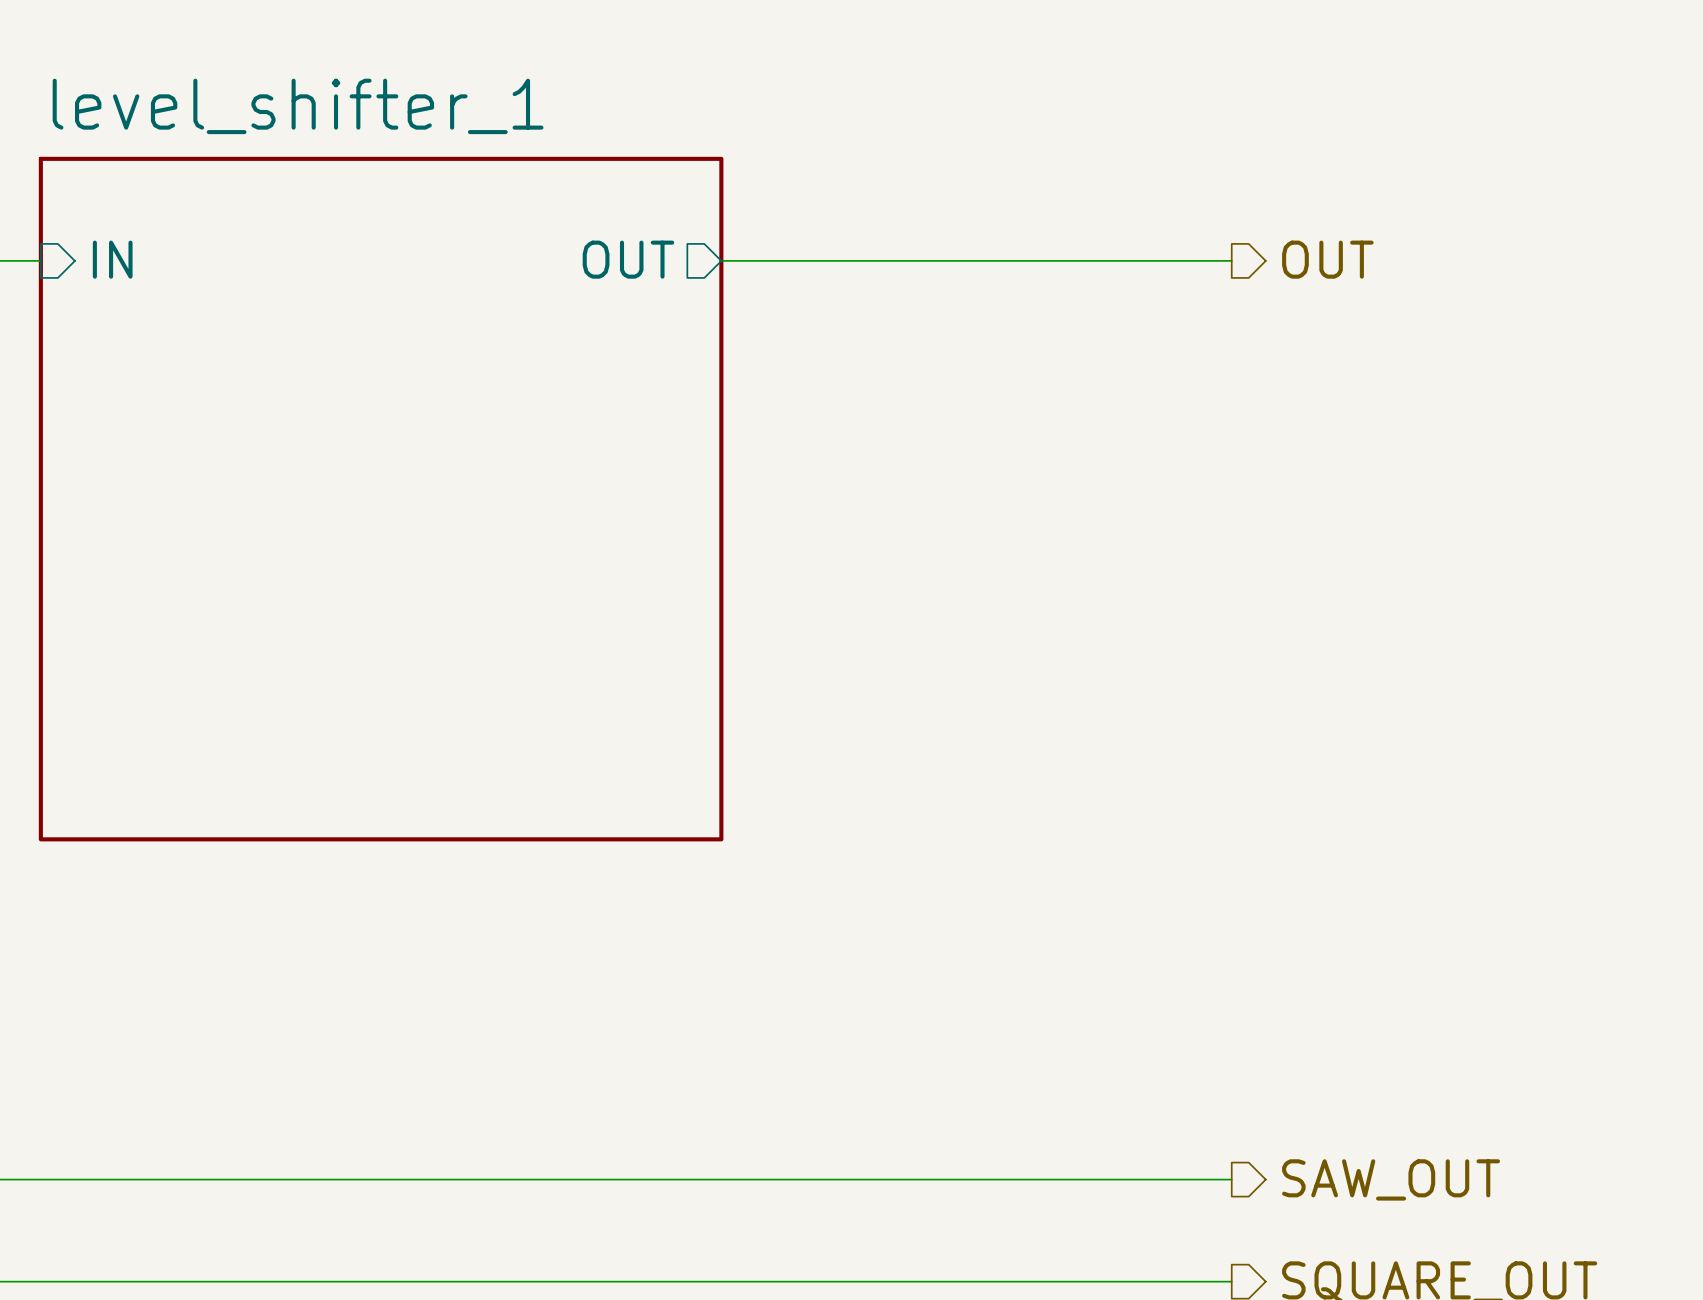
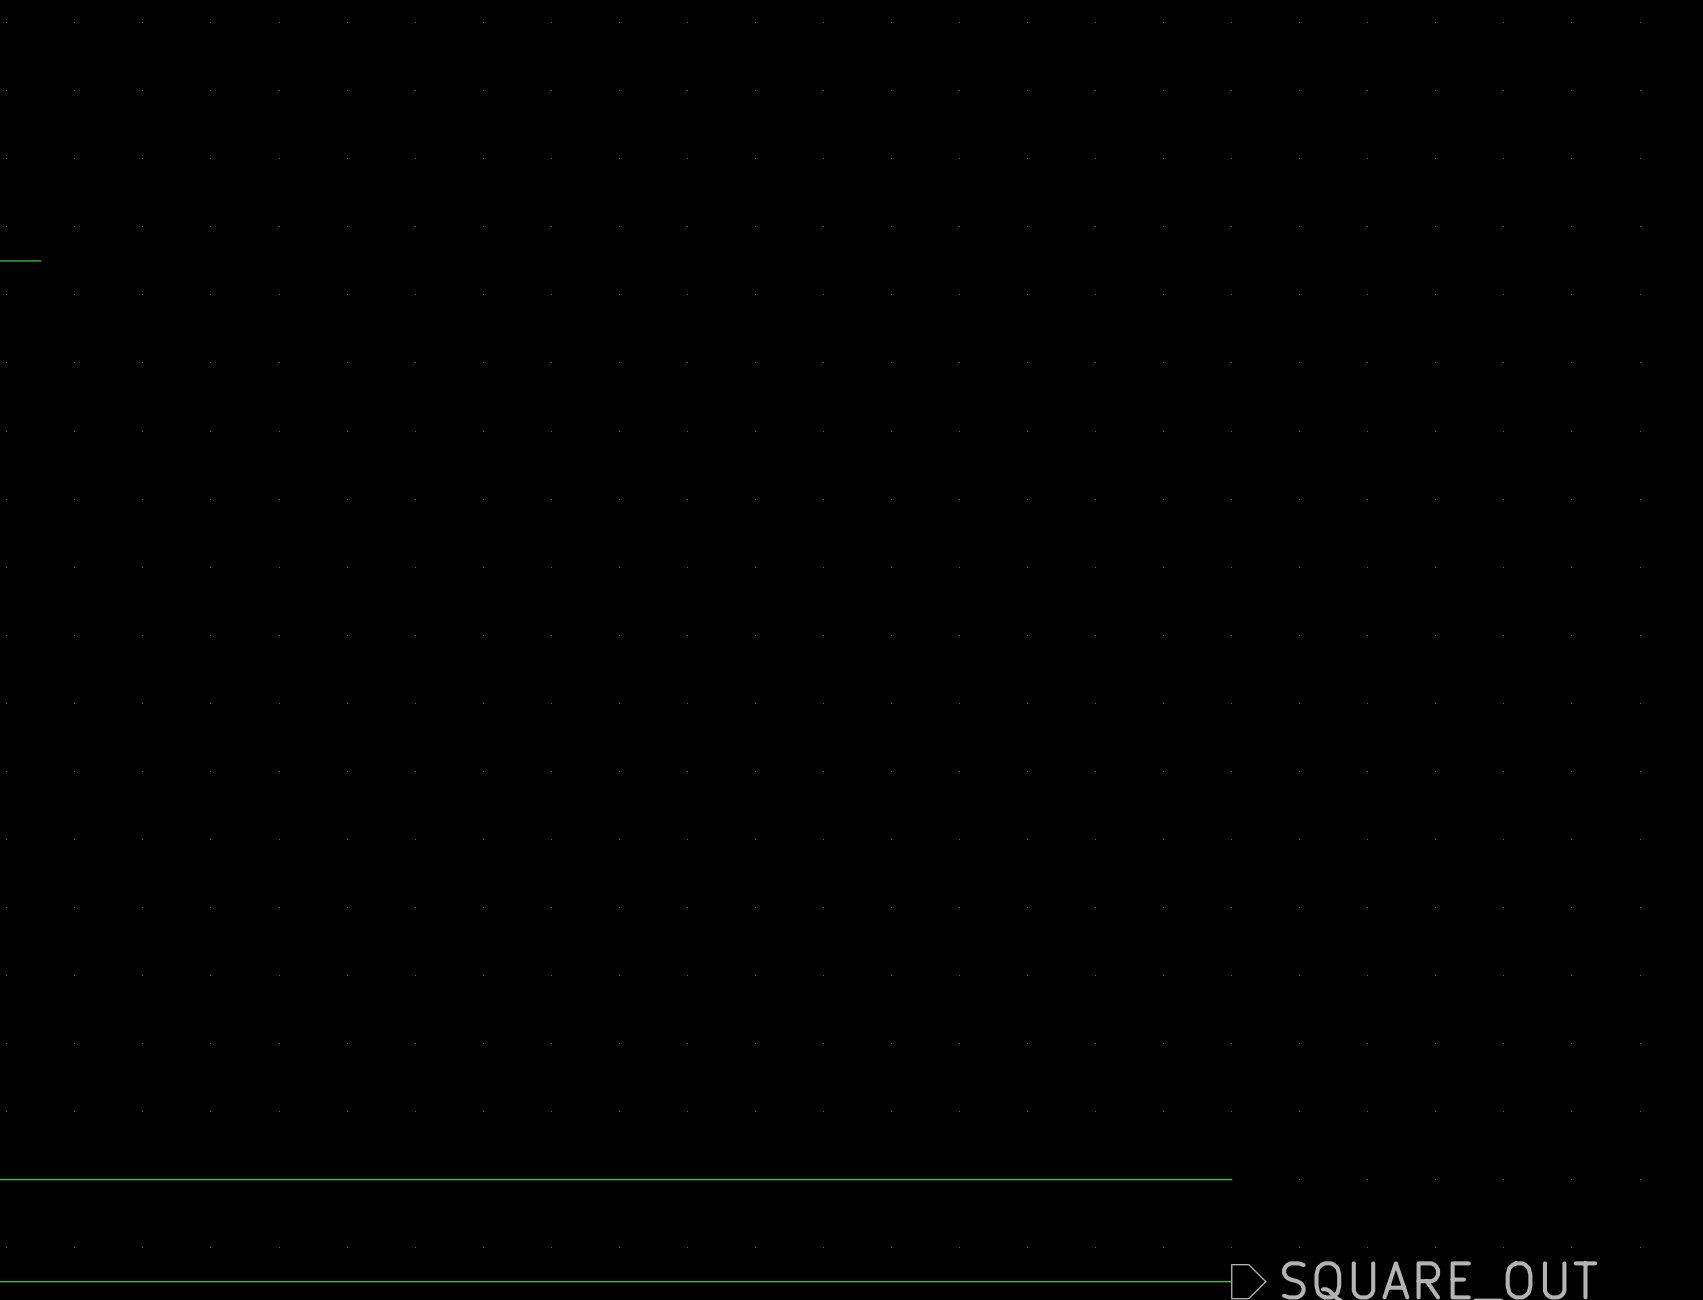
sheet pin: IN (112, 259) -> none
sheet pin: OUT (628, 259) -> none
hierarchical label: OUT (1327, 259) -> none
wire: (721, 260) (1231, 260) -> none
sheet level_shifter_1: (381, 499) -> none
hierarchical label: SAW_OUT (1391, 1179) -> none

